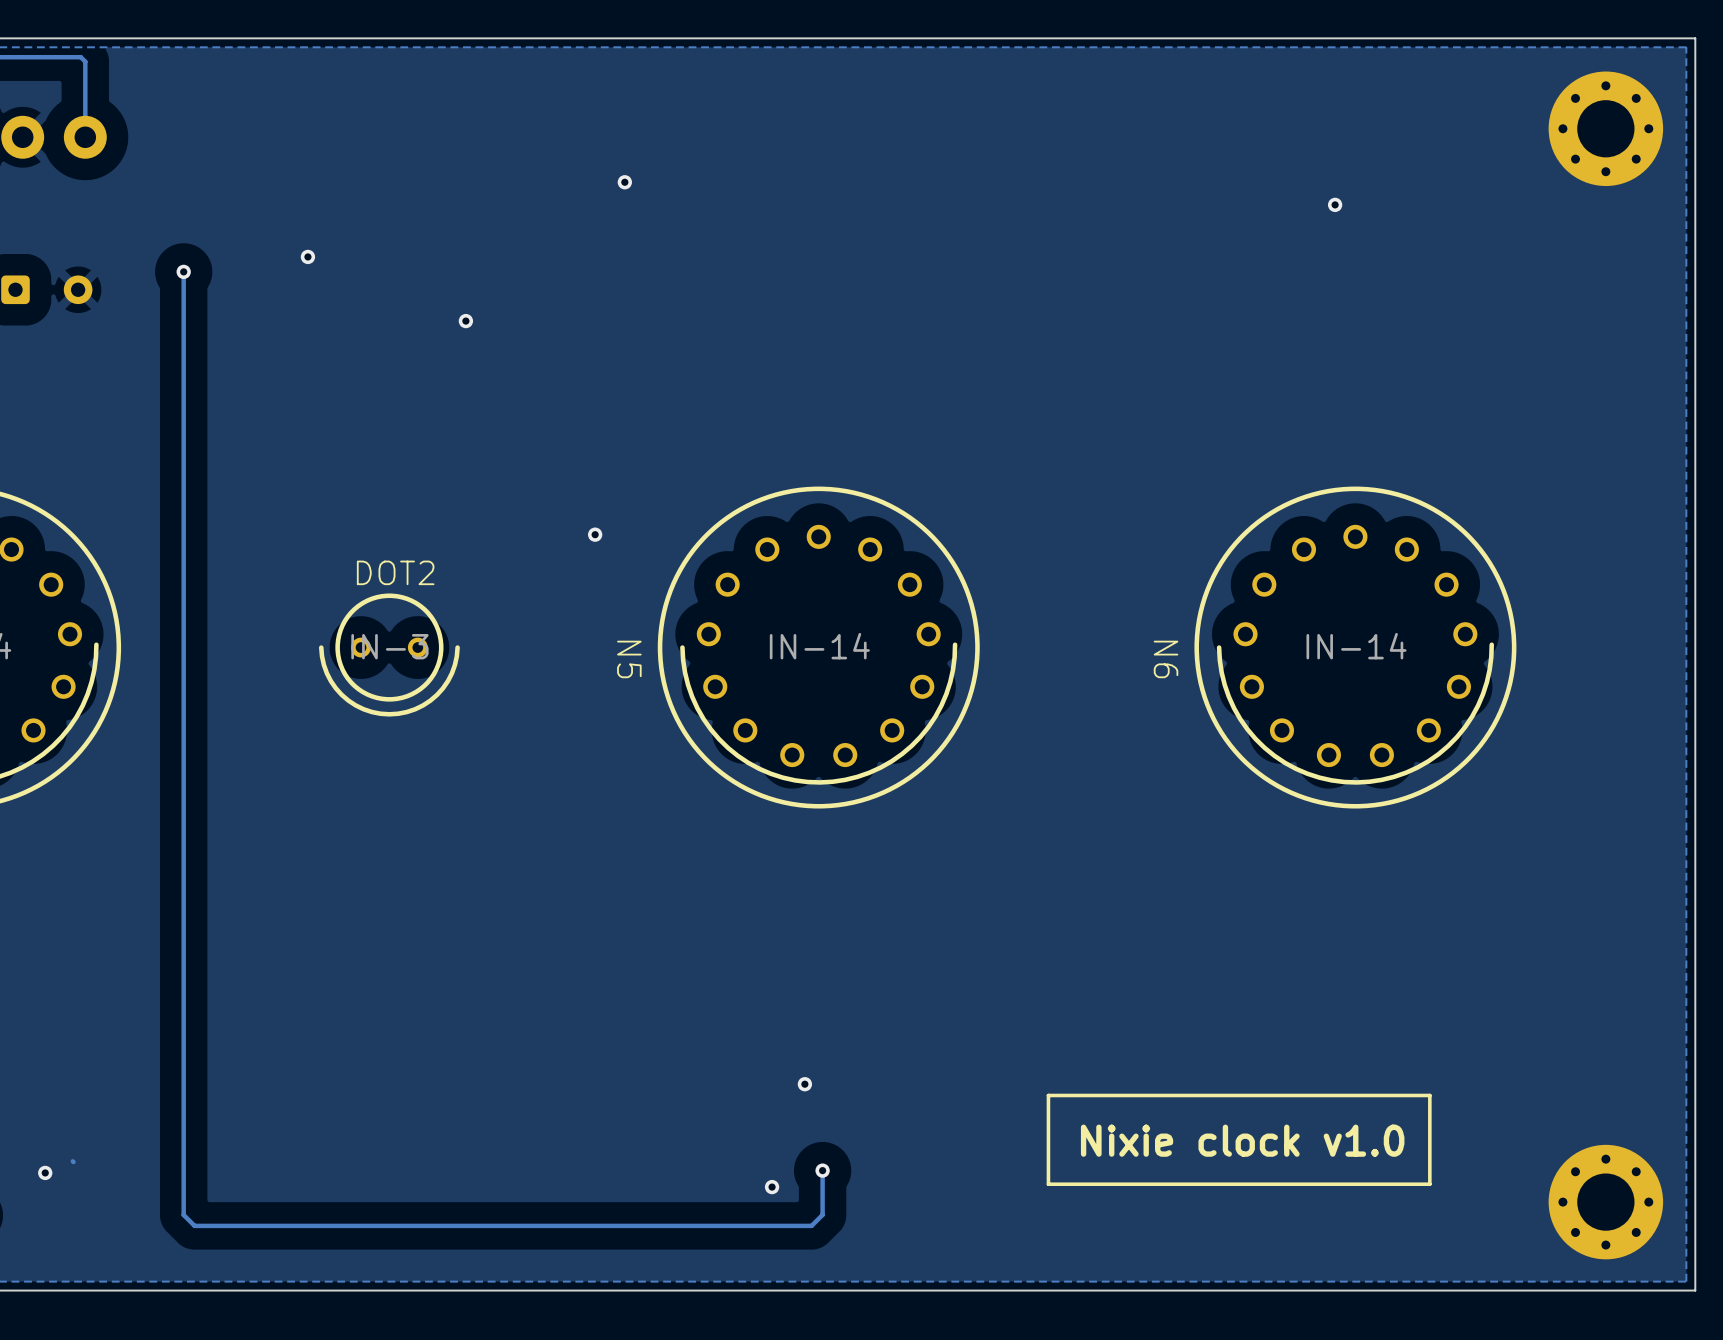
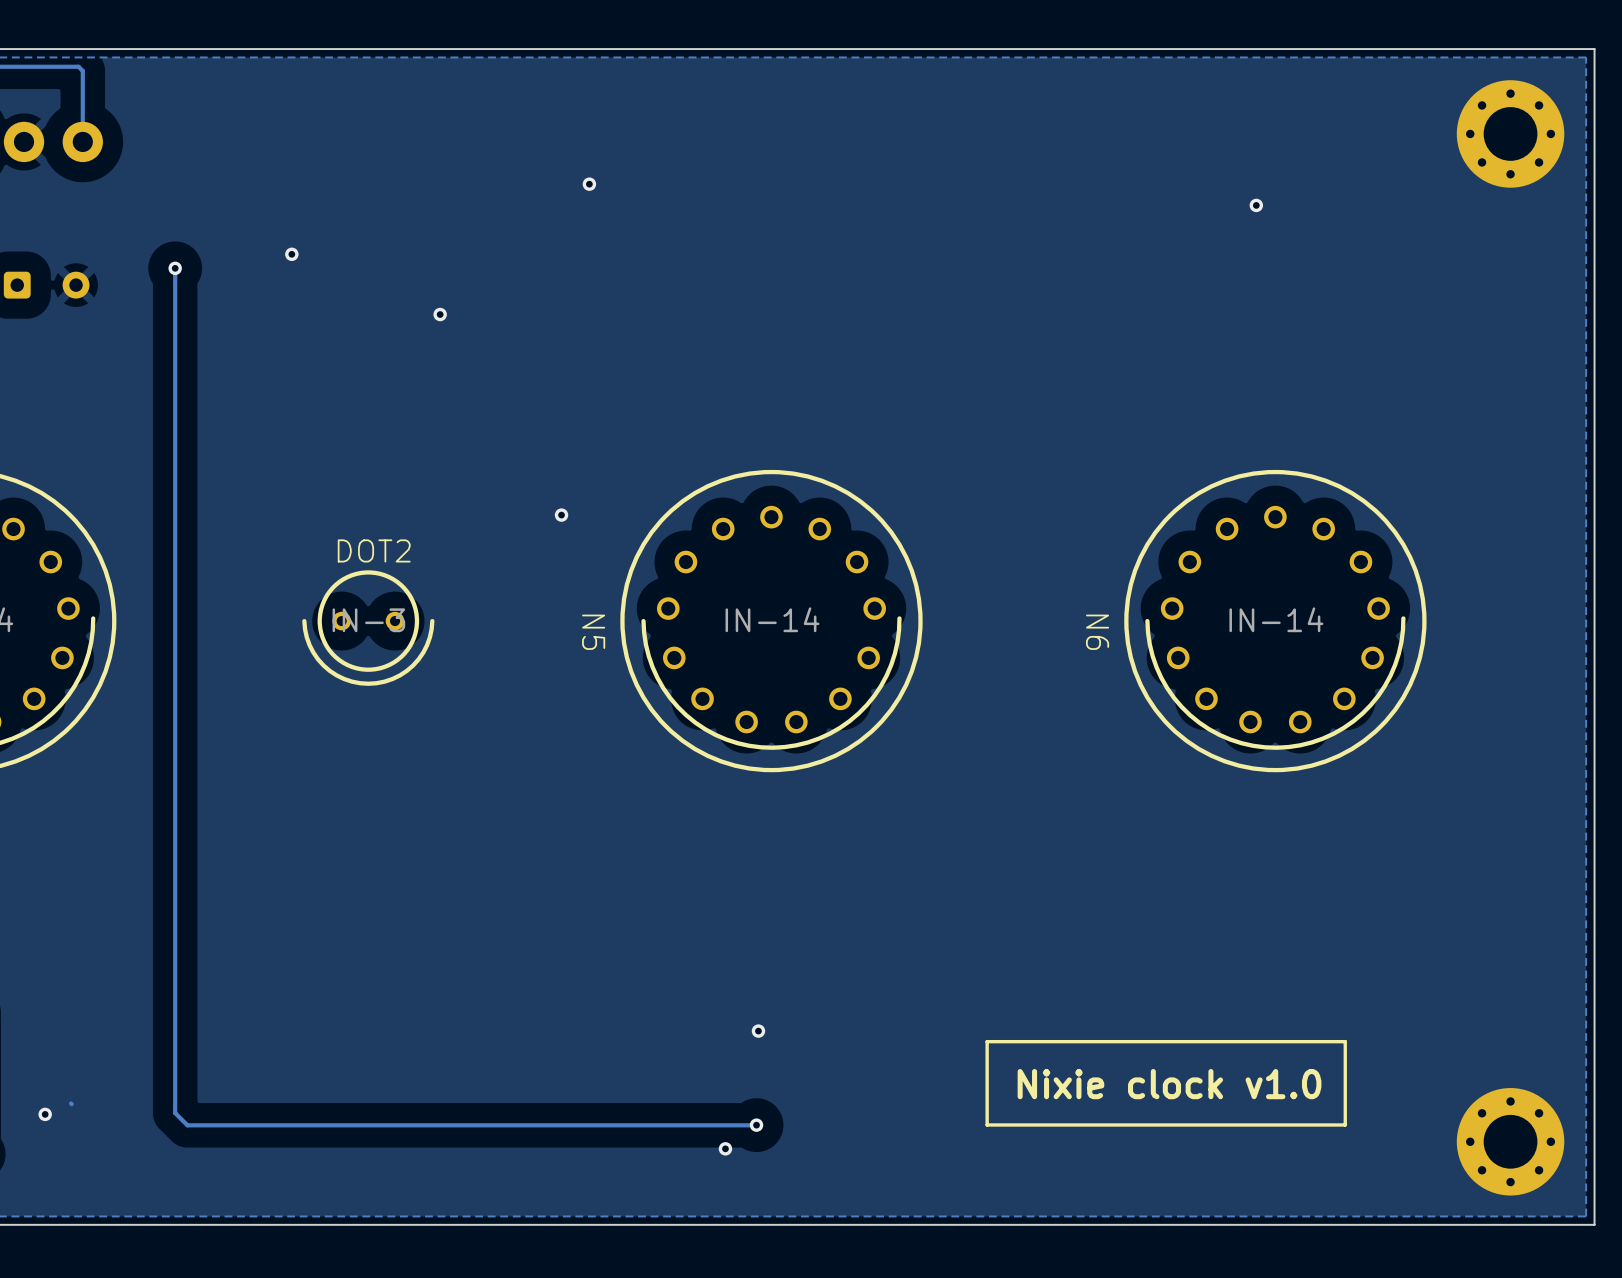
track: (822, 1170) (822, 1214) (811, 1225) (194, 1225) (183, 1214) (183, 1171) -> (756, 1125) (187, 1125) (175, 1113)
via: (822, 1170) -> none
via: none -> (756, 1125)
via: (772, 1187) -> none
via: none -> (725, 1148)

